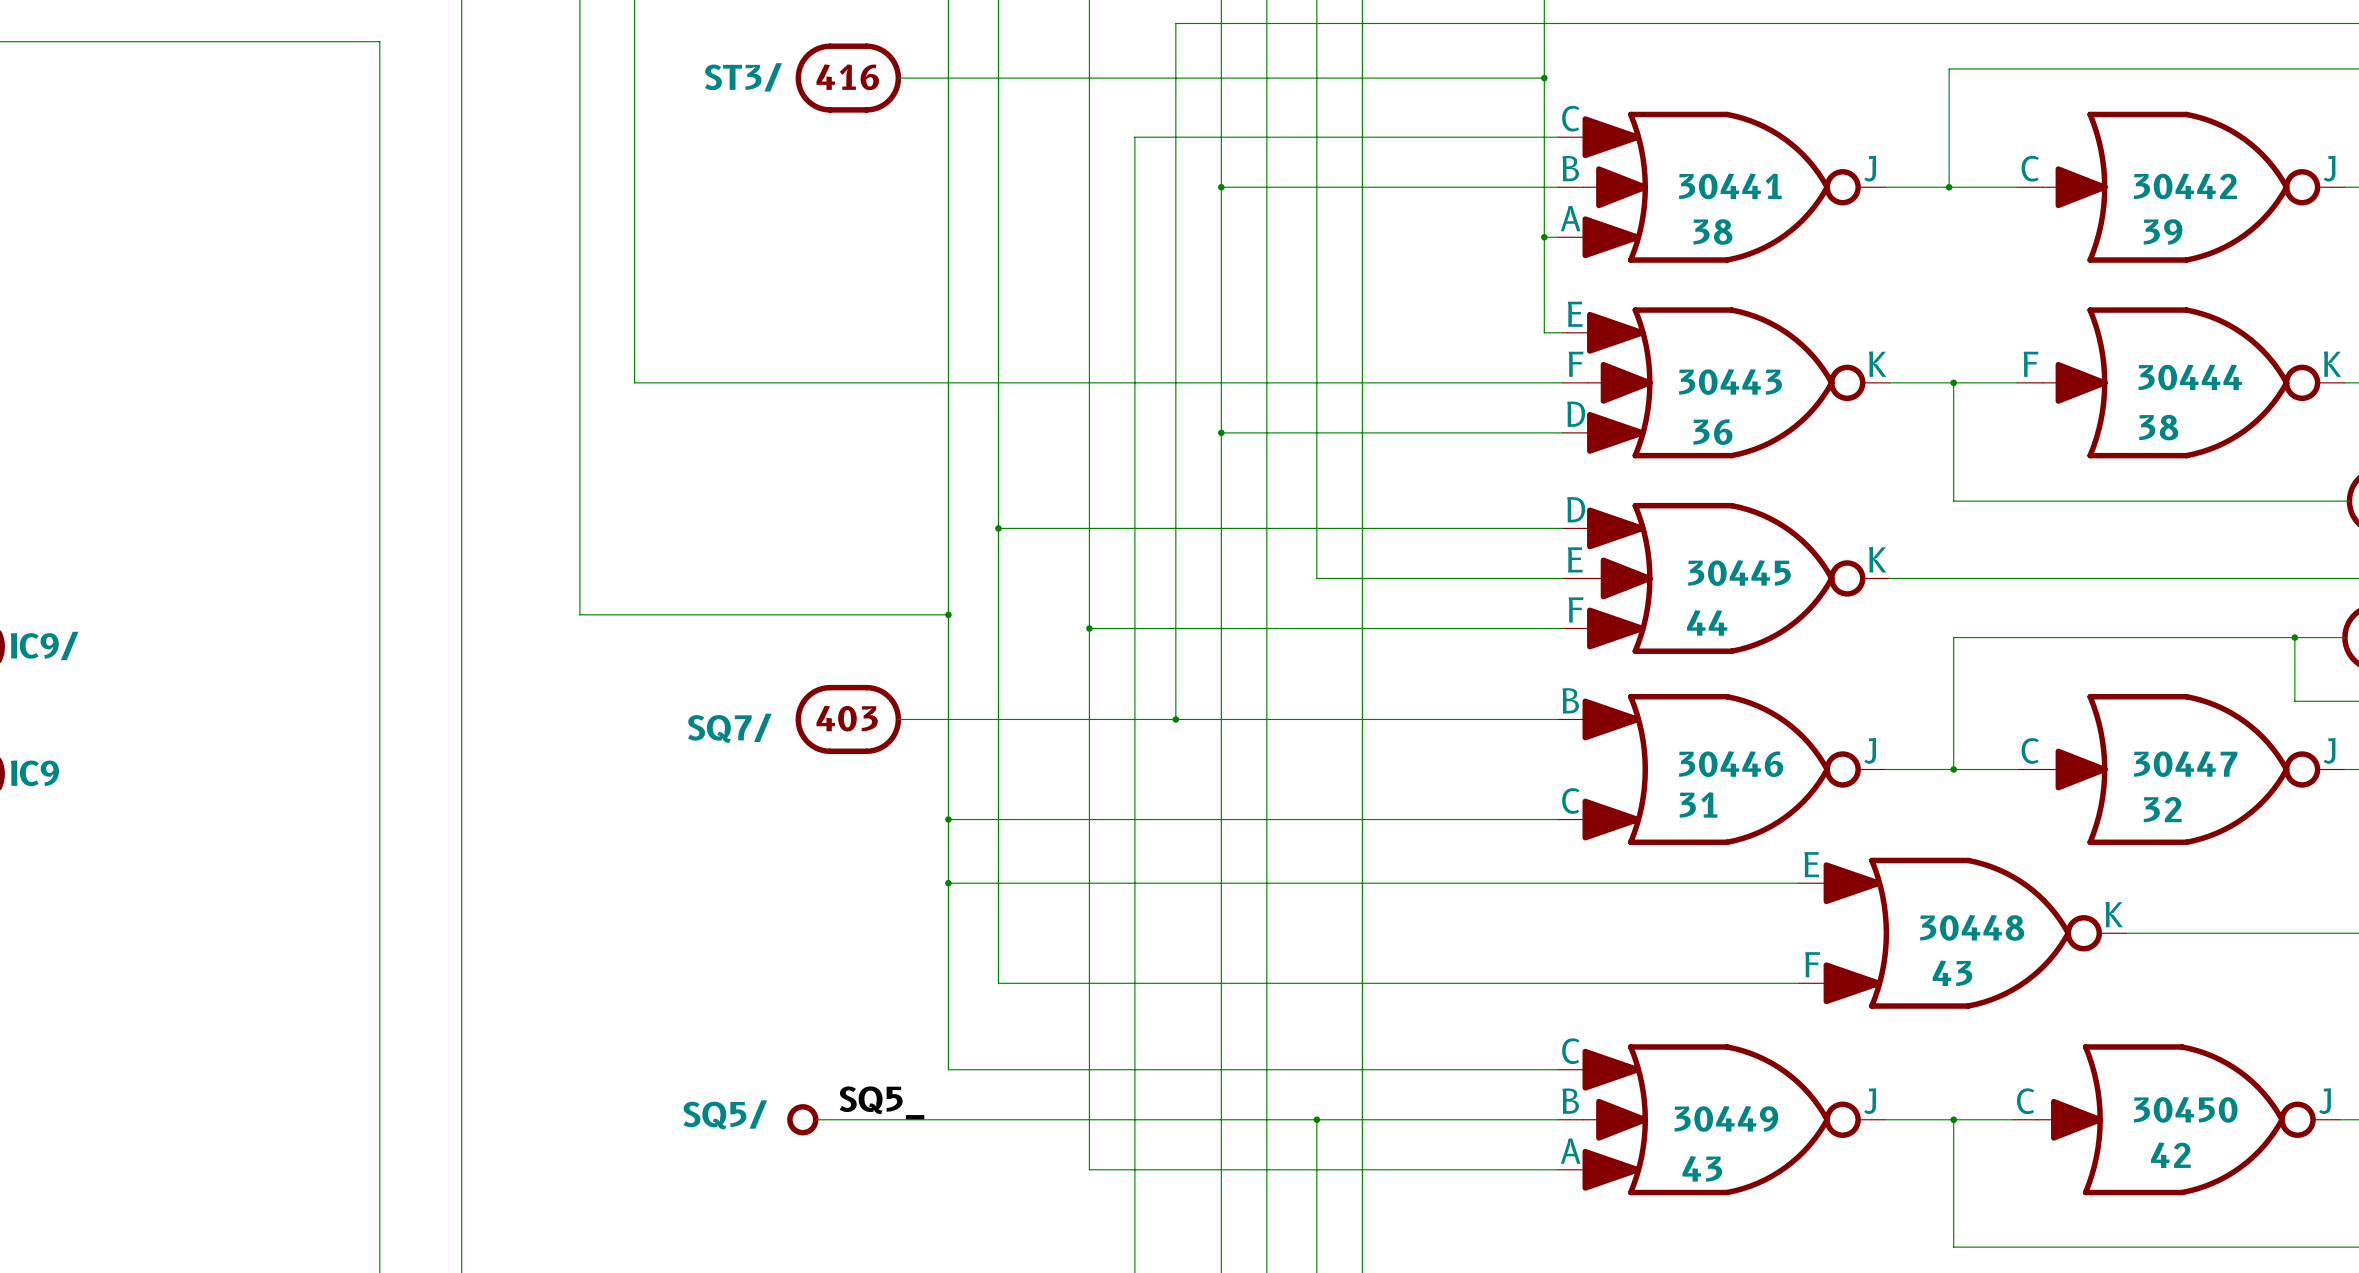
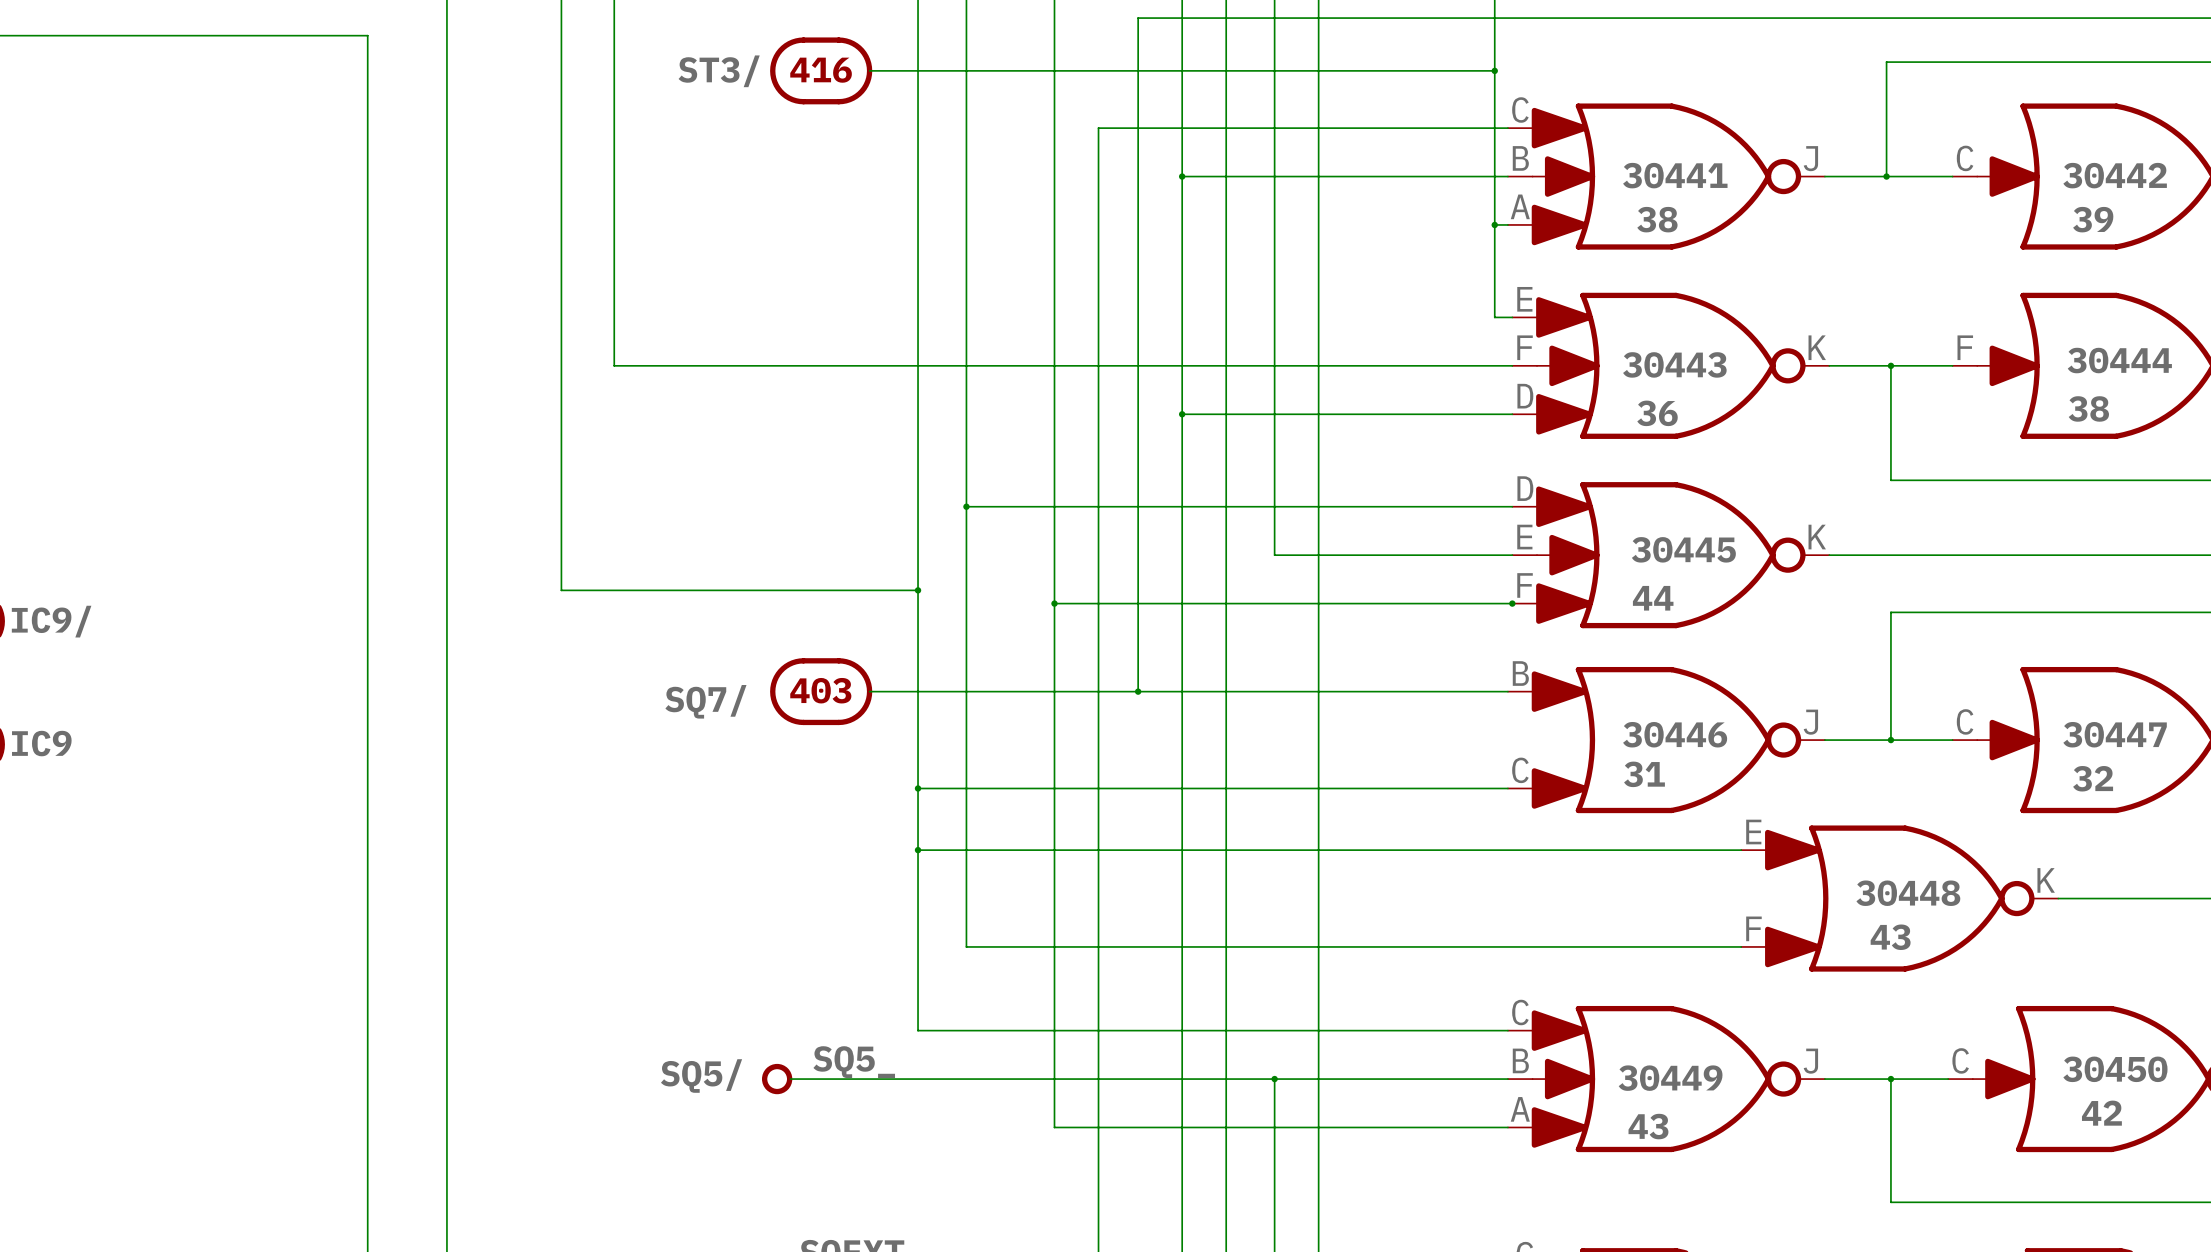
junction: none -> (1512, 603)

